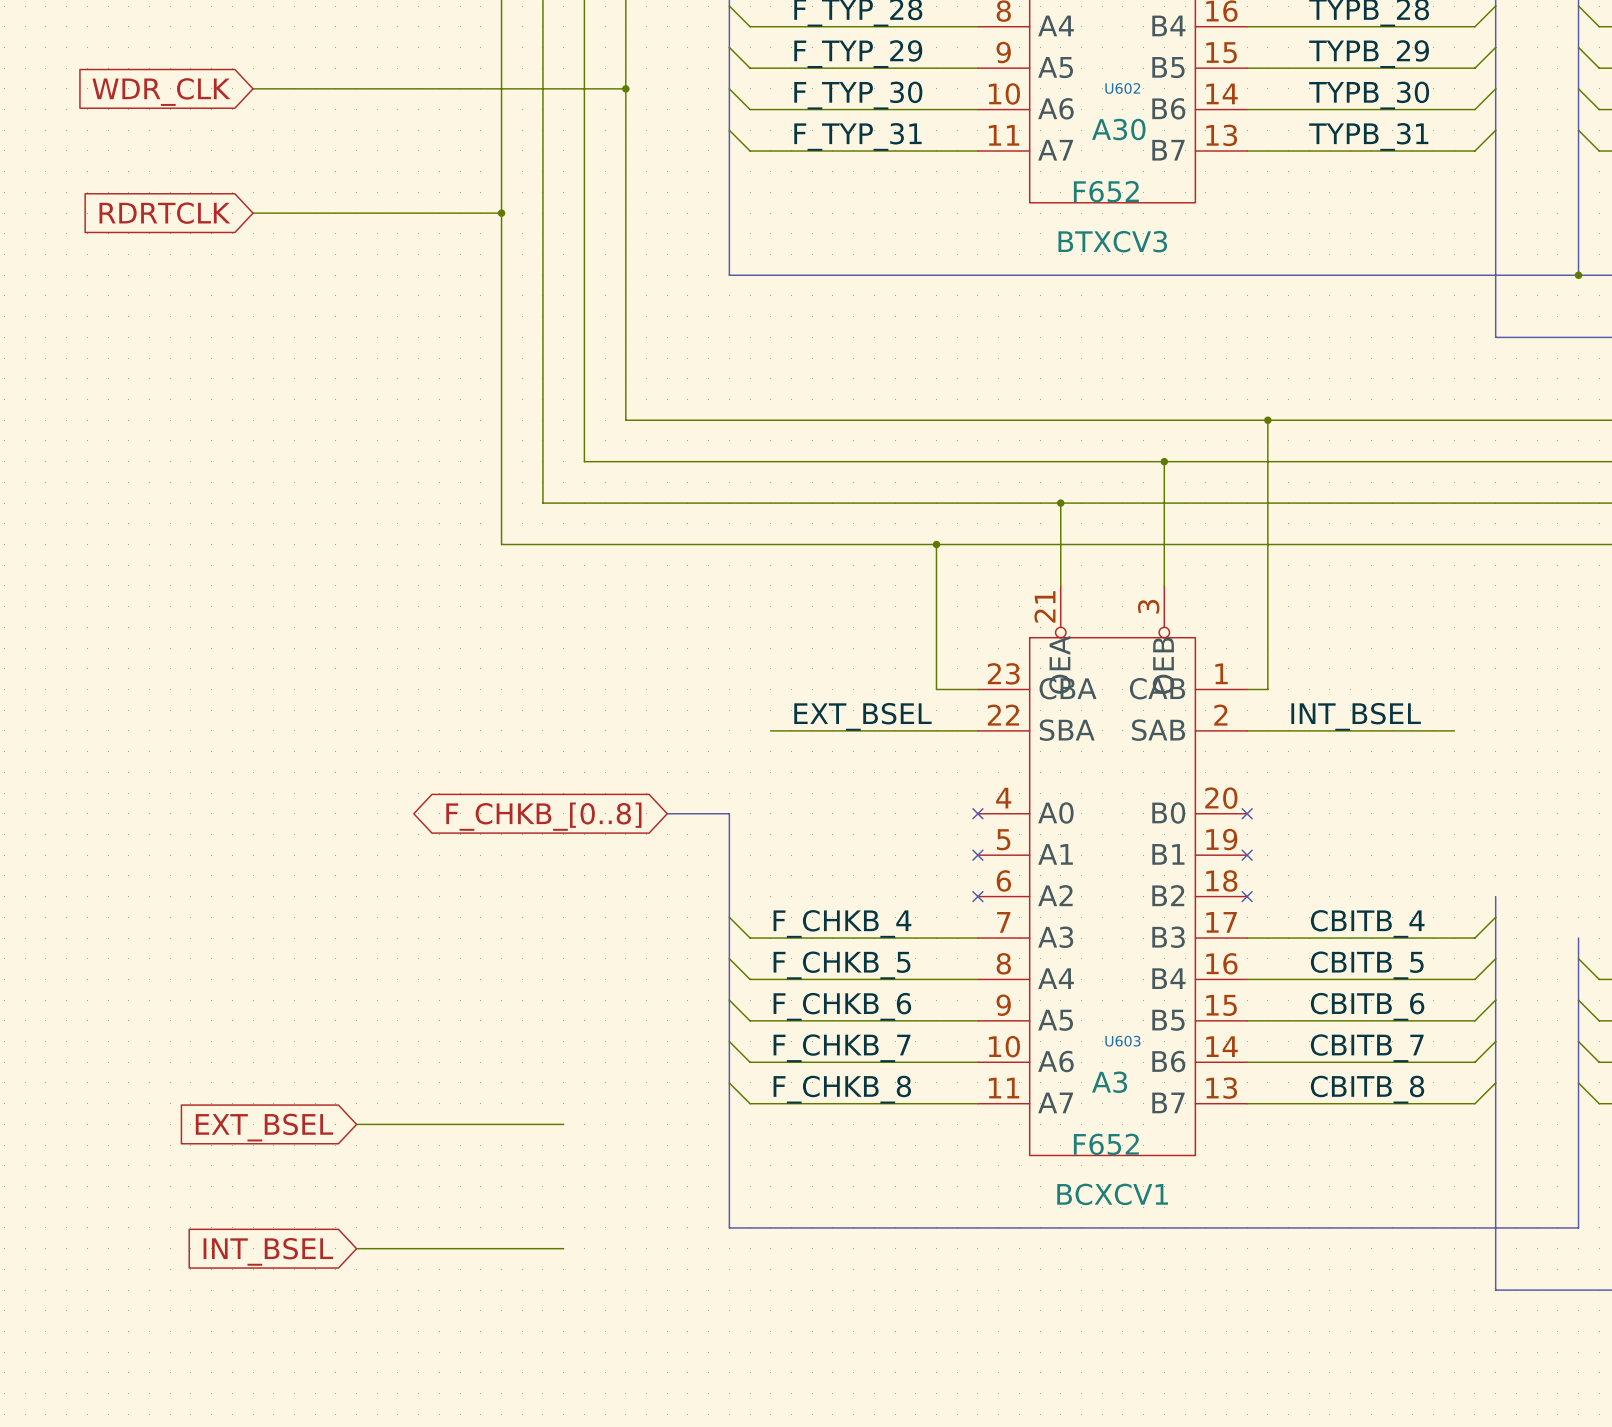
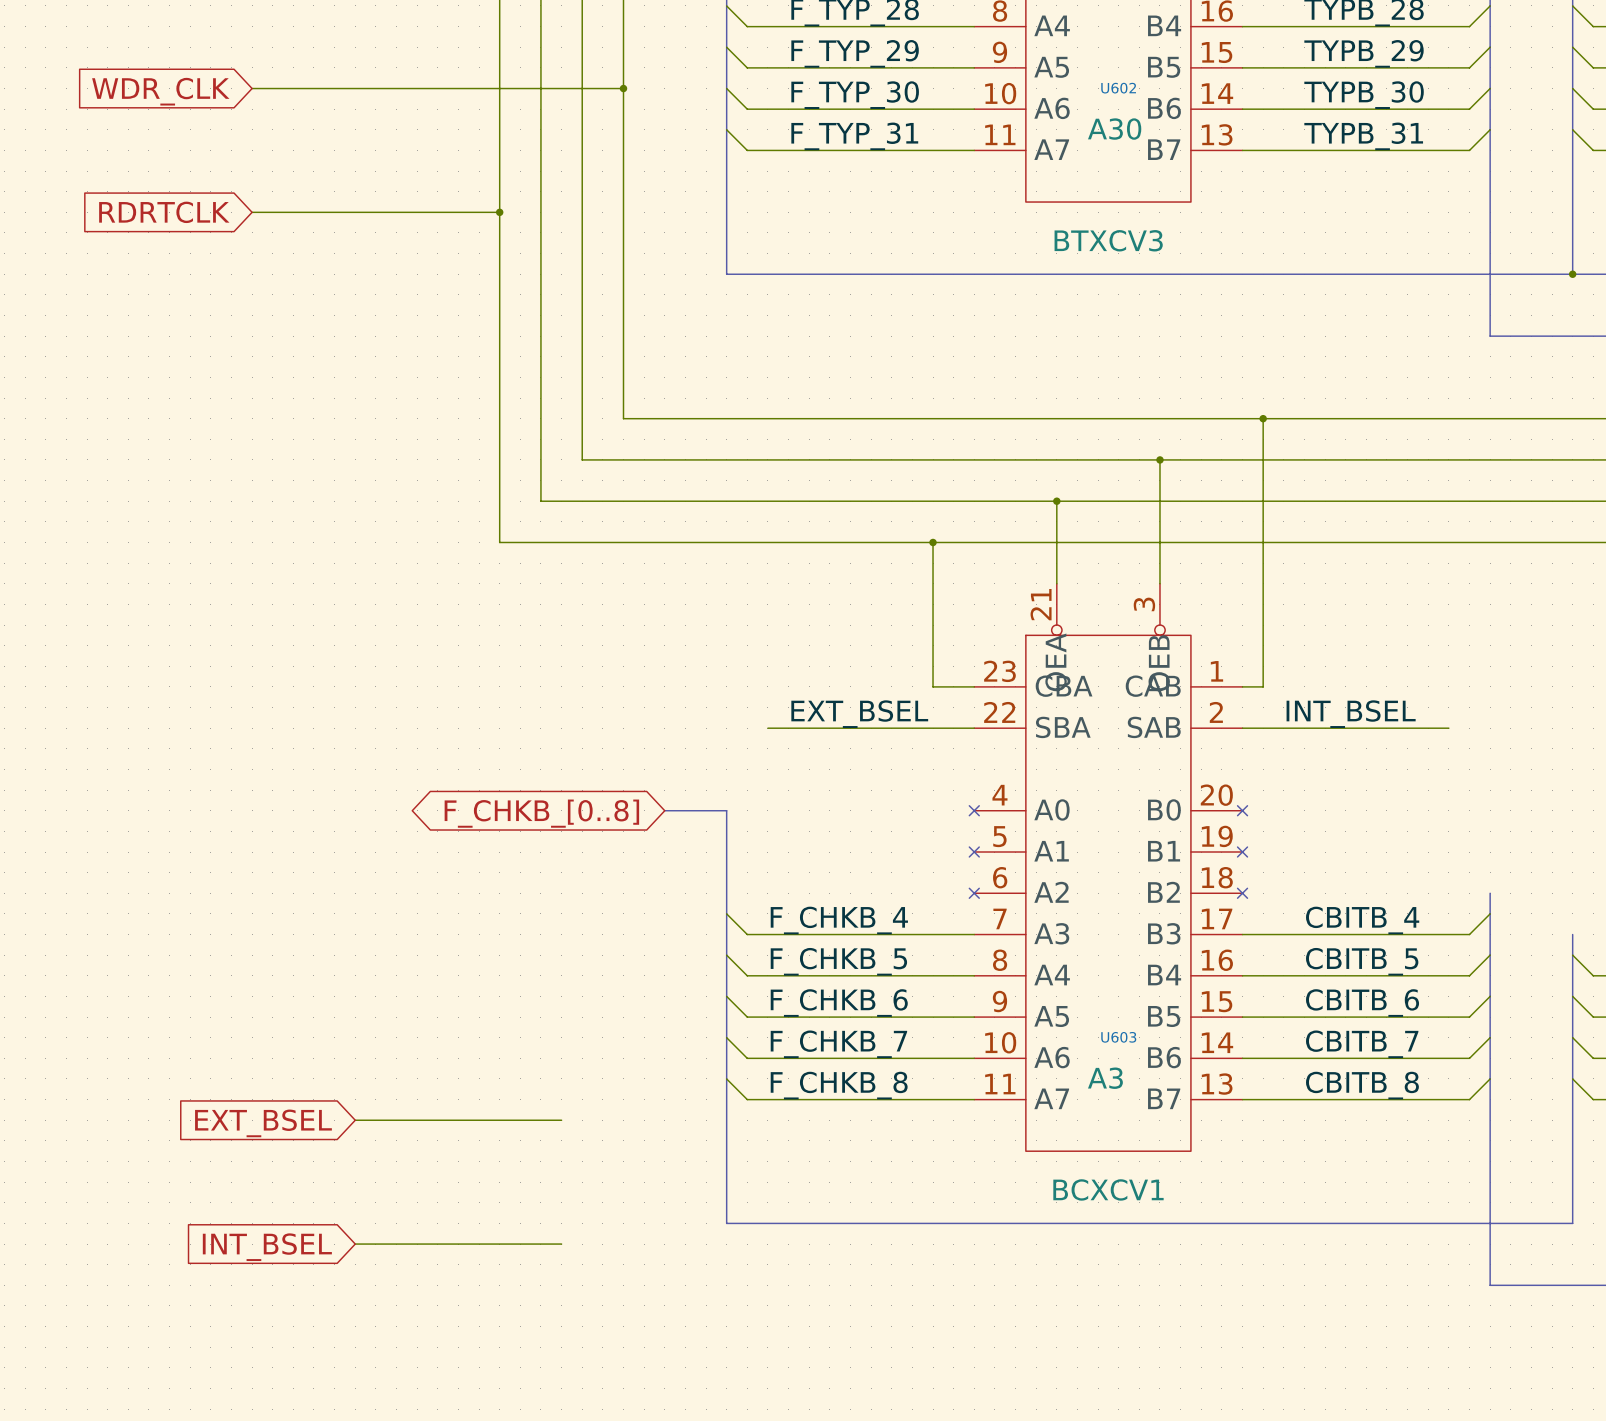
U602 value: F652 (1106, 191) -> none
U603 value: F652 (1106, 1144) -> none

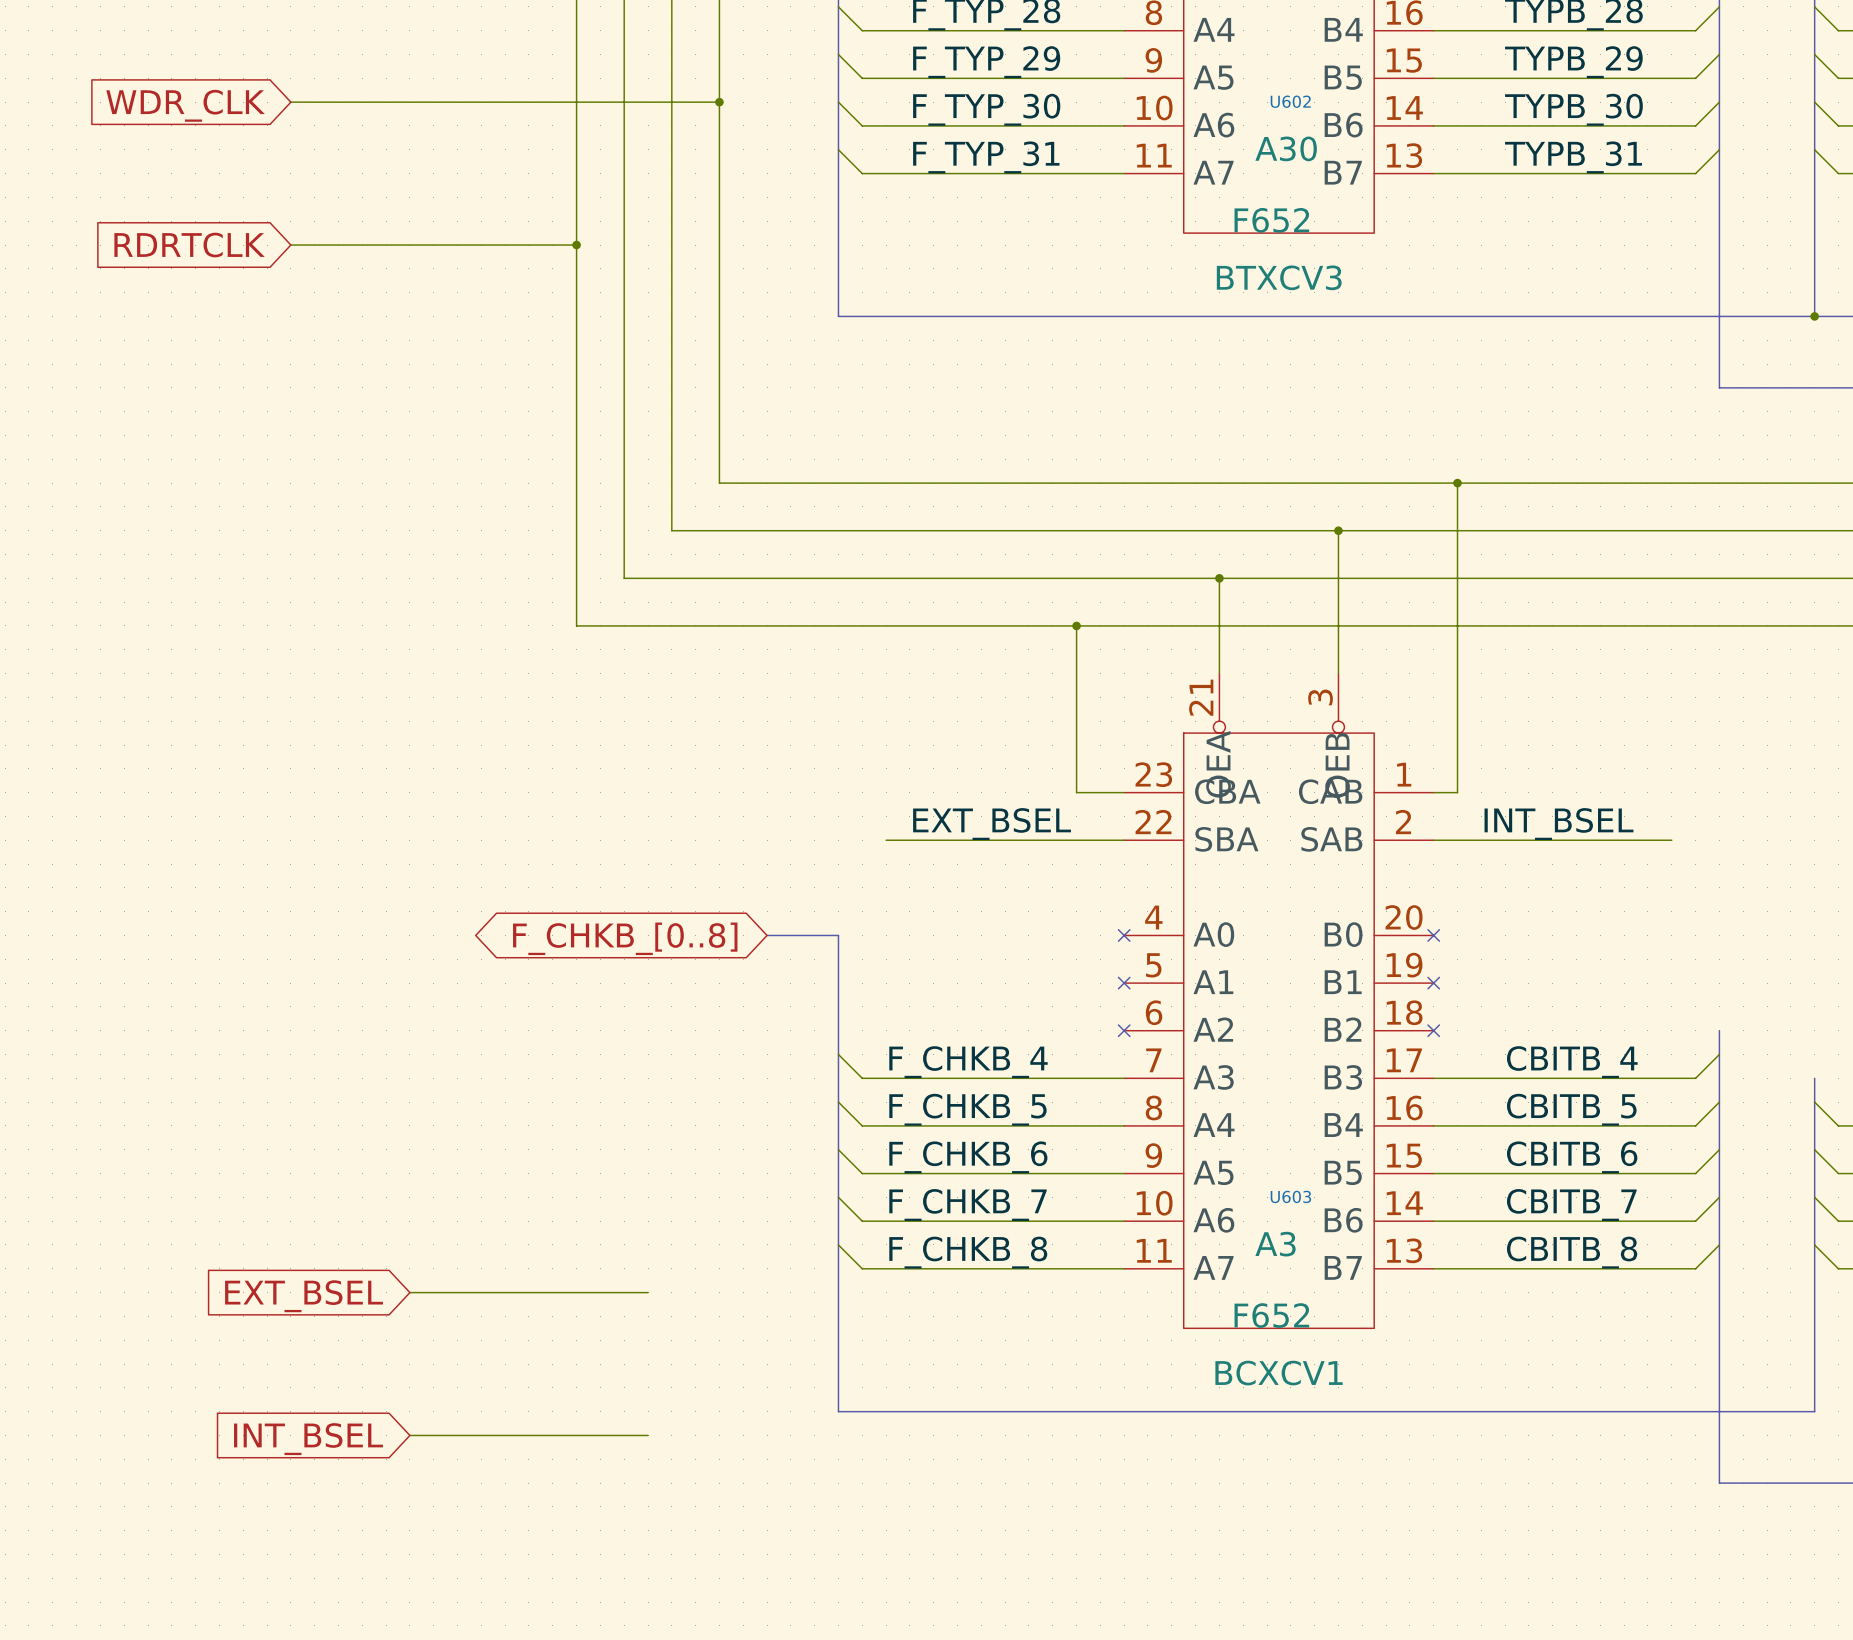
U602 value: none -> F652 (1271, 220)
U603 value: none -> F652 (1271, 1315)

